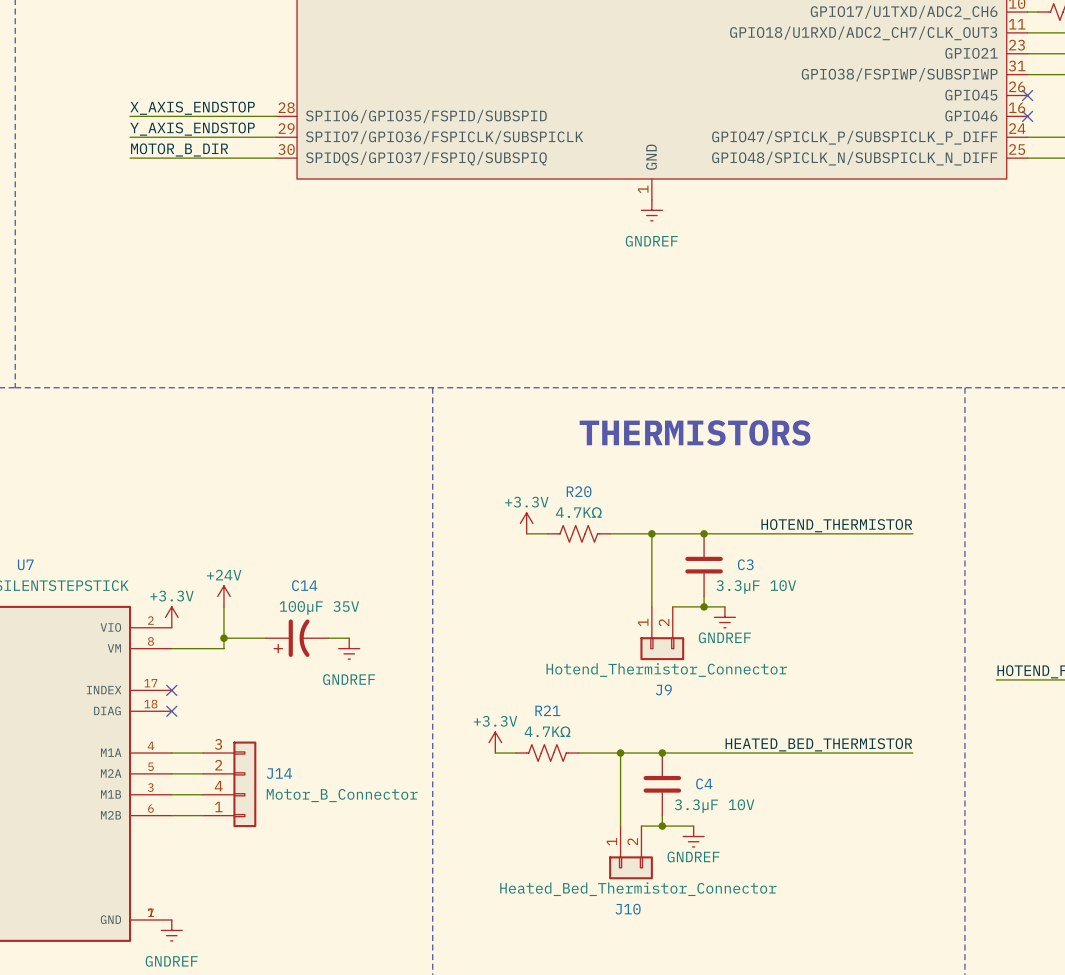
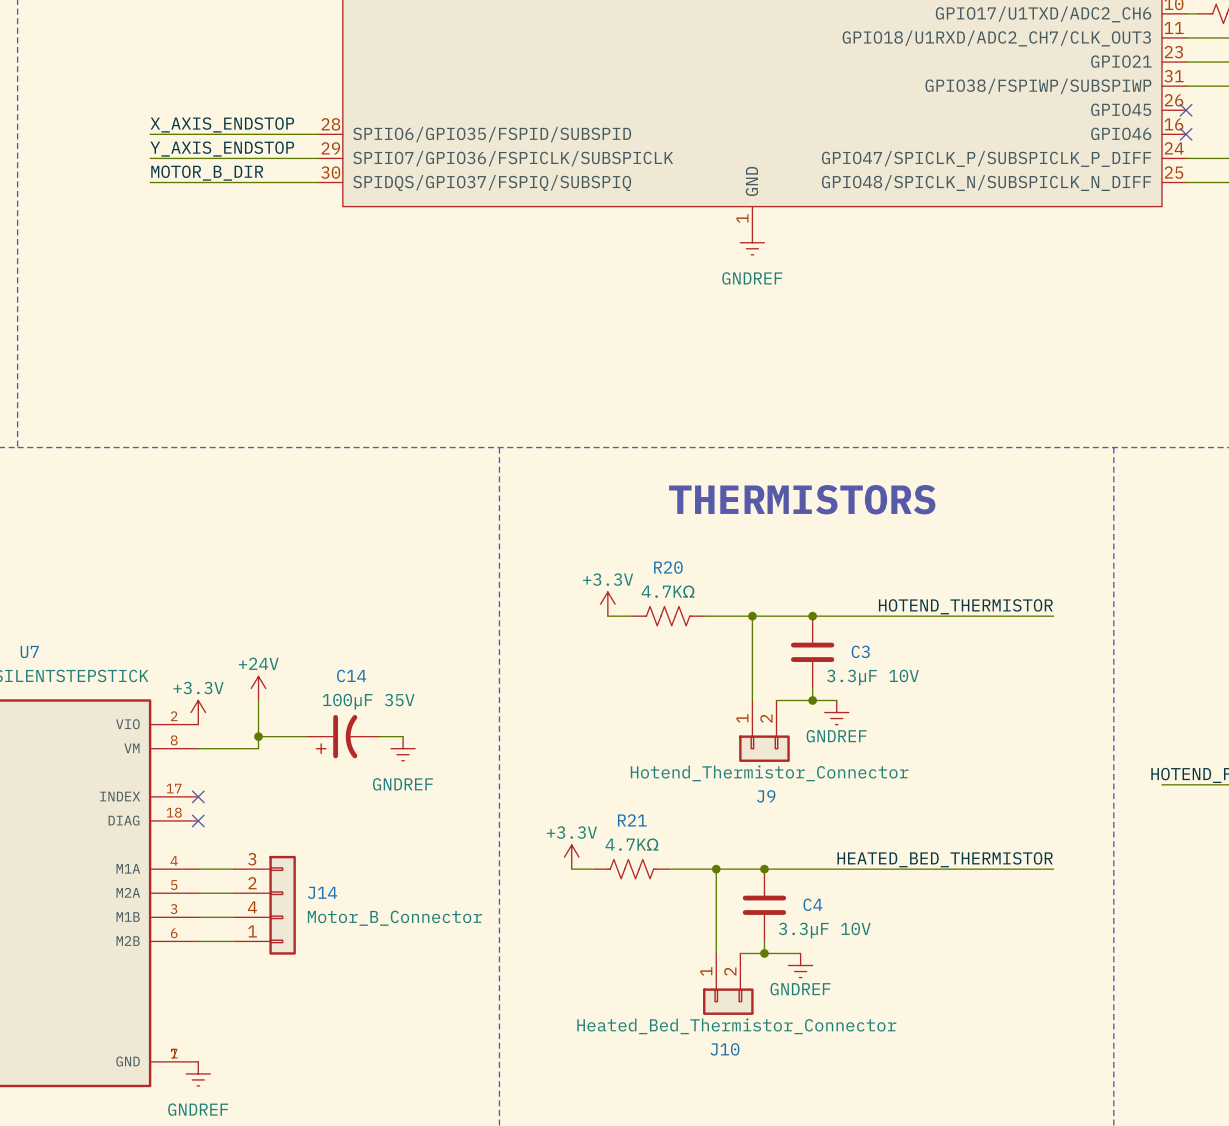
wire: (996, 679) (1006, 679) -> none

